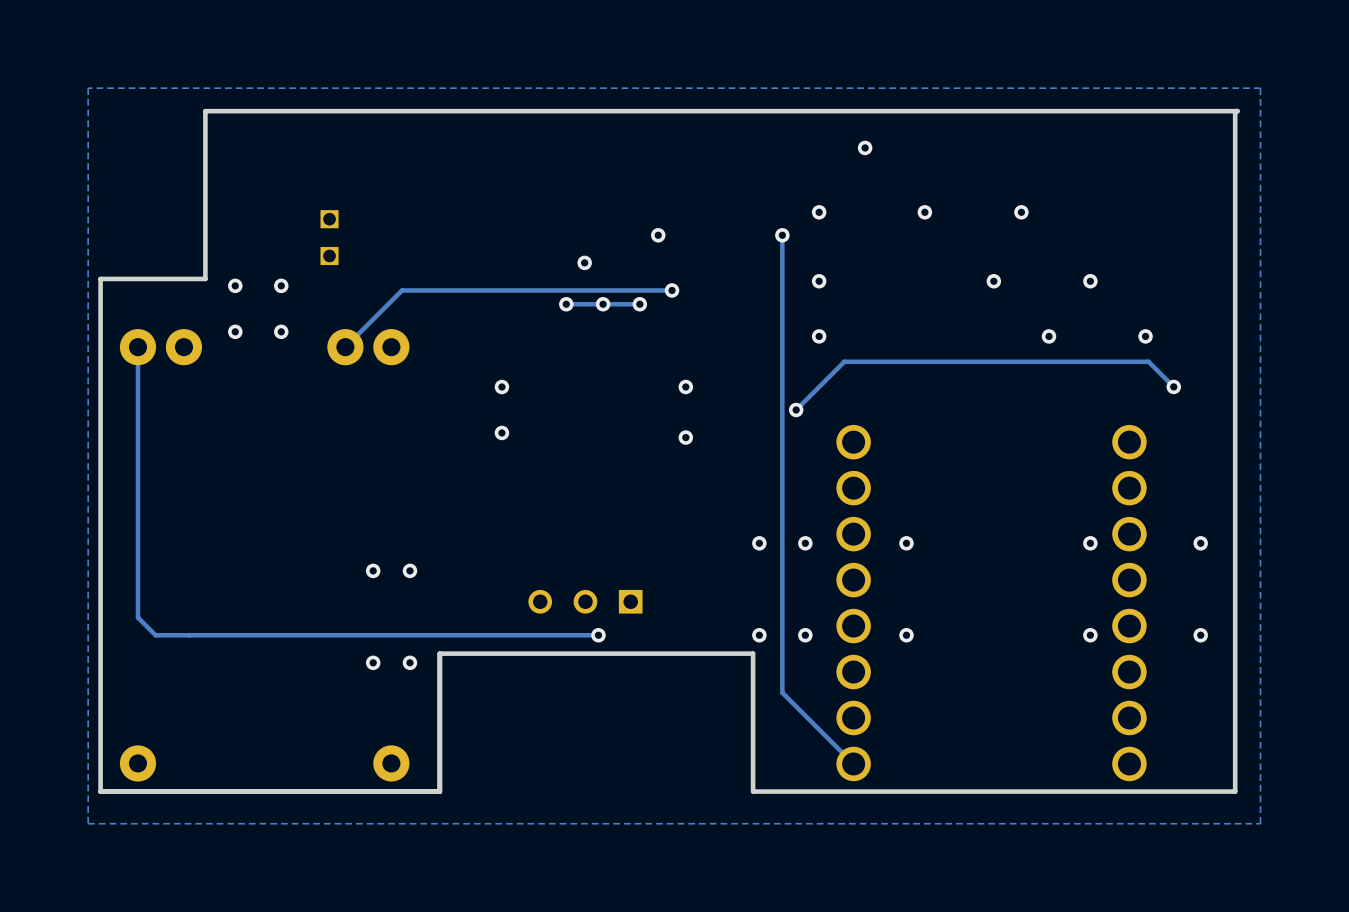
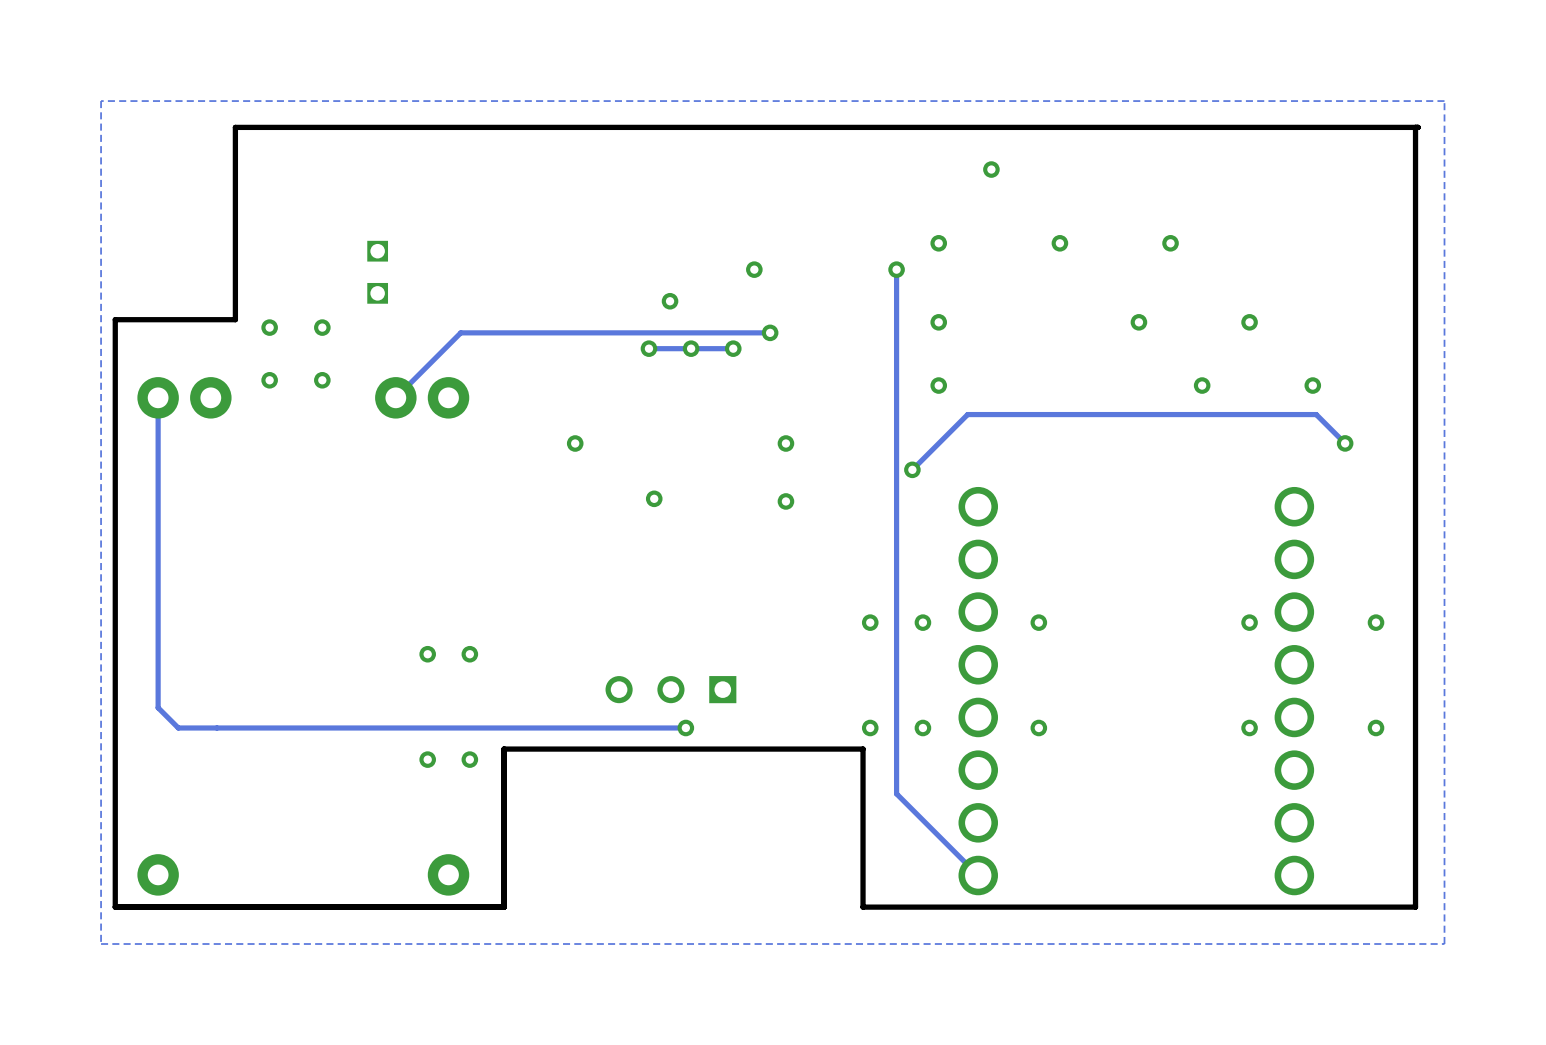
via position: (501, 432) -> (654, 498)

